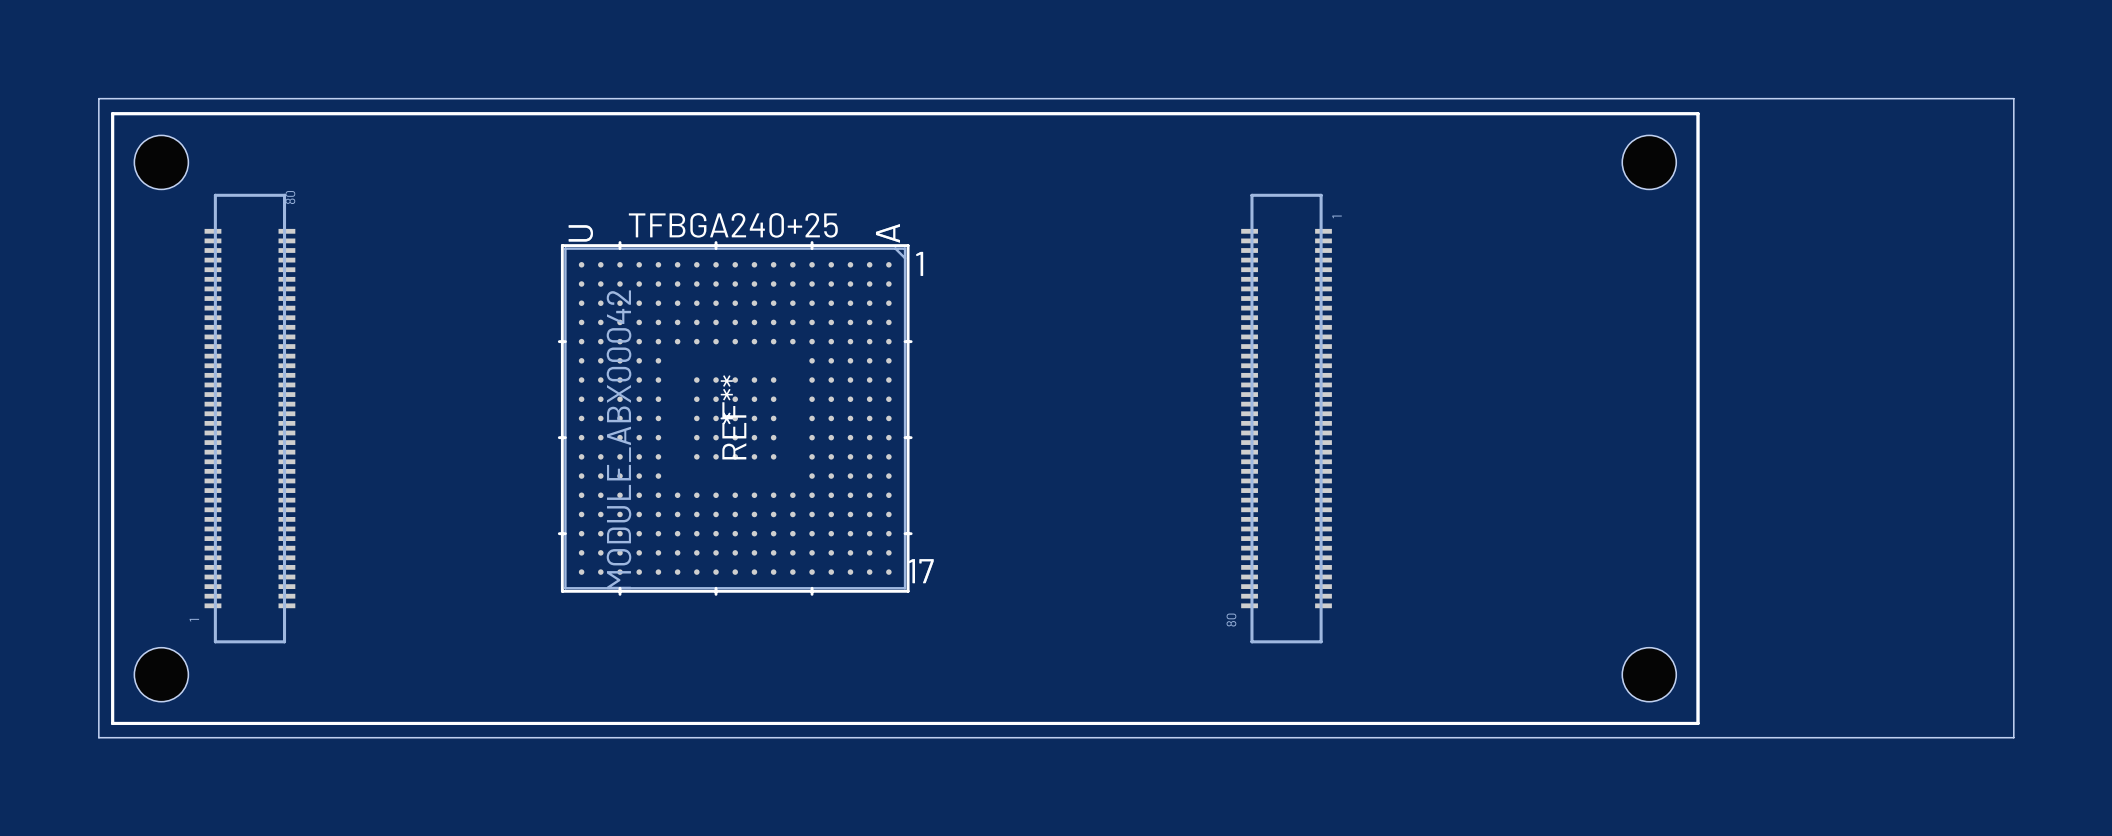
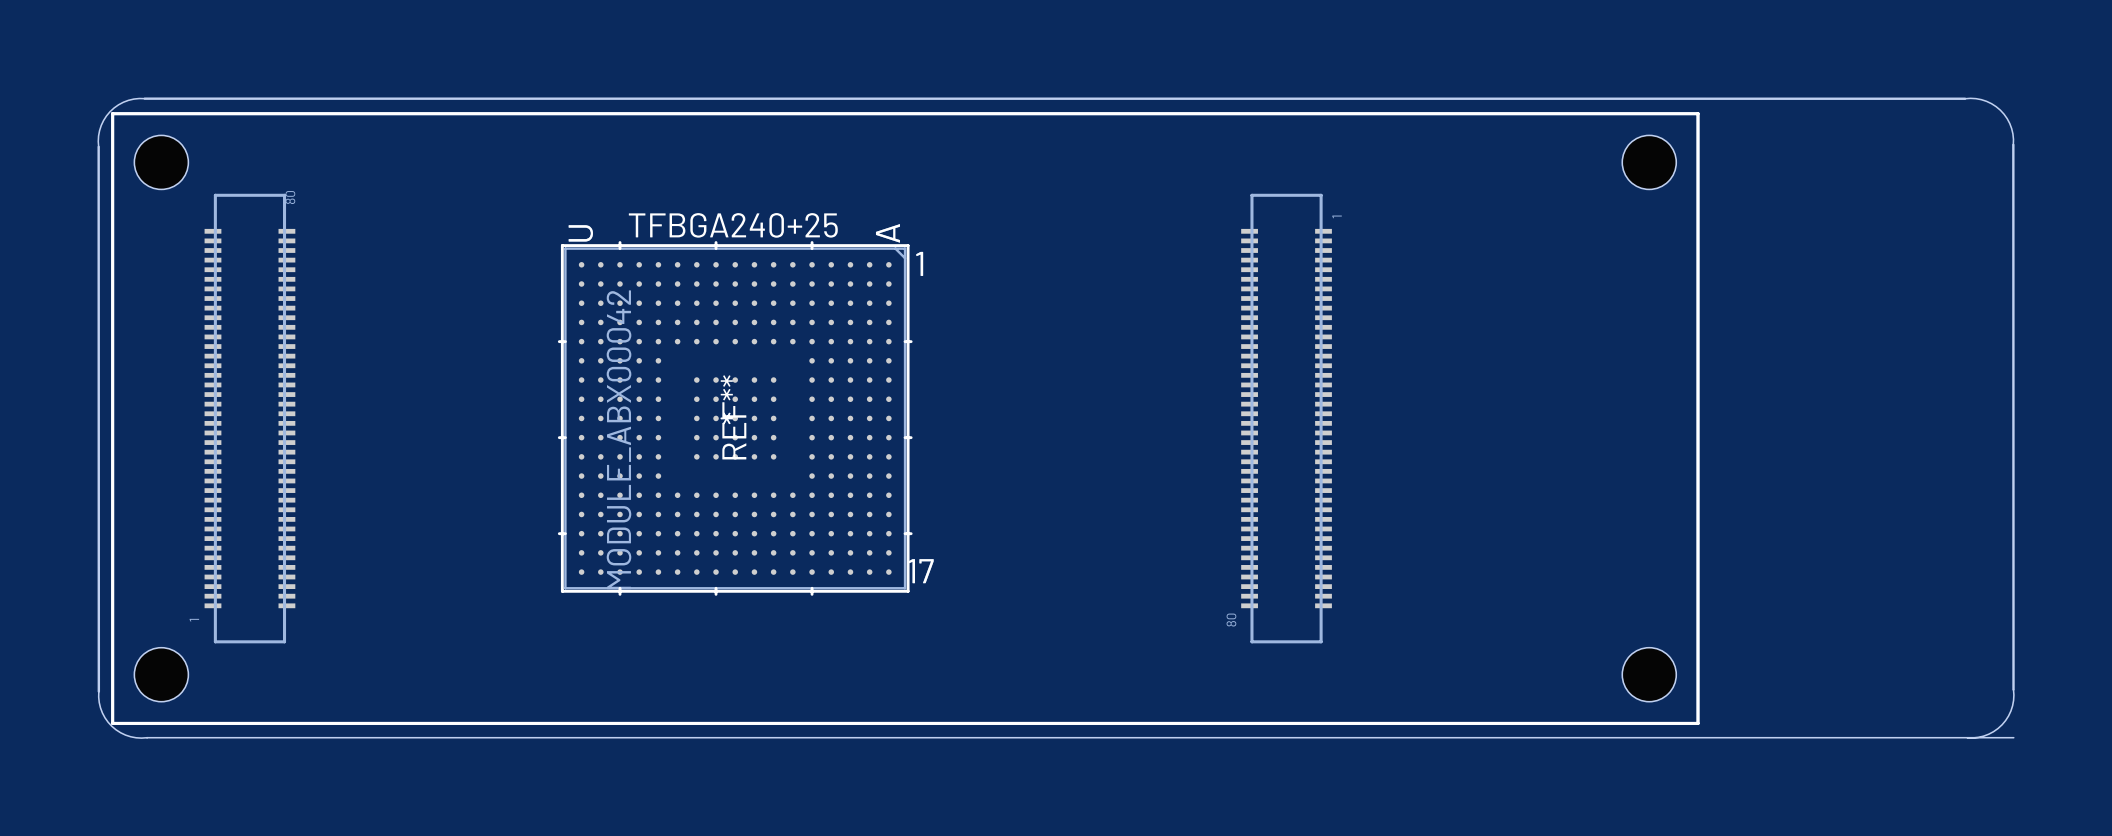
board edge: (147, 737) (98, 737) (98, 98) (2013, 98) (2013, 737) -> (147, 737) (130, 736) (116, 729) (104, 717) (98, 697) (98, 141) (101, 125) (106, 115) (118, 104) (128, 100) (139, 98) (1970, 98) (1986, 101) (2000, 110) (2009, 123) (2013, 139) (2013, 695) (2010, 711) (2002, 724) (1988, 734) (1967, 737)

